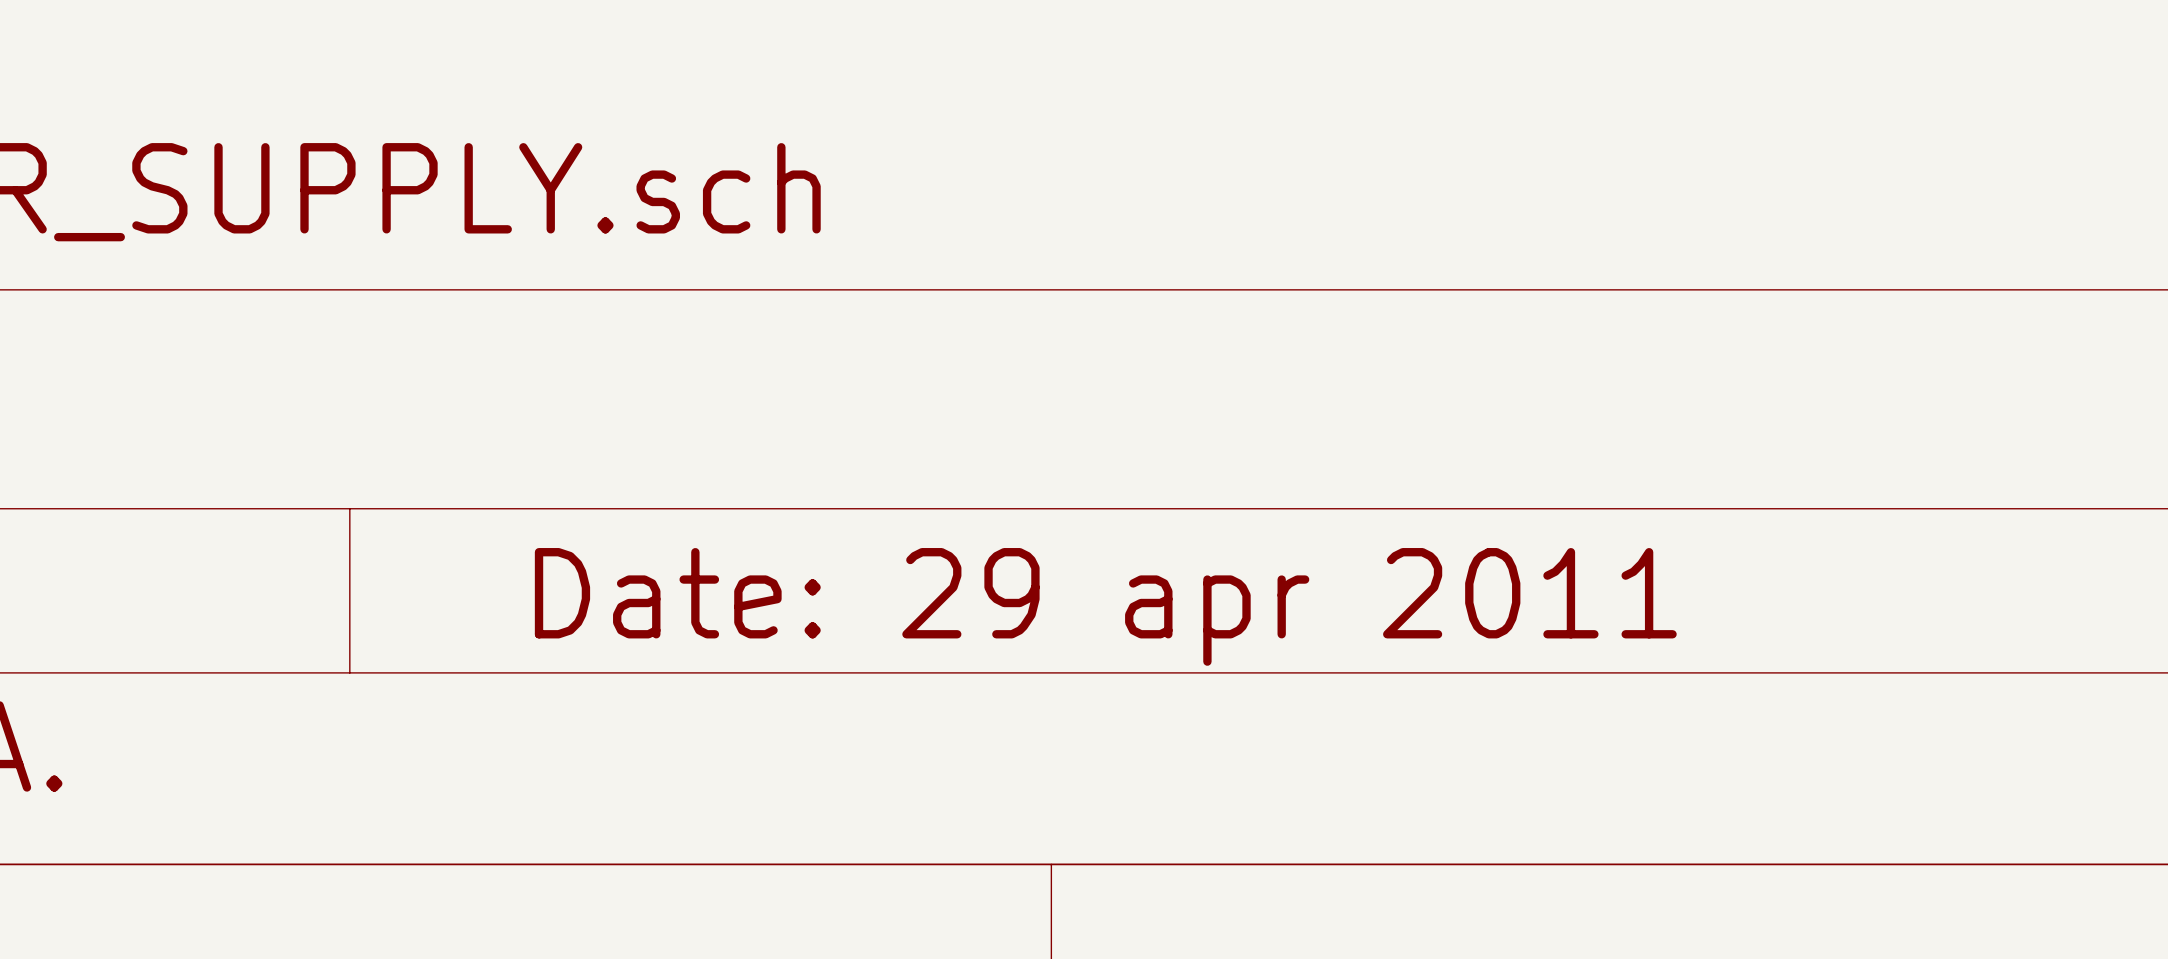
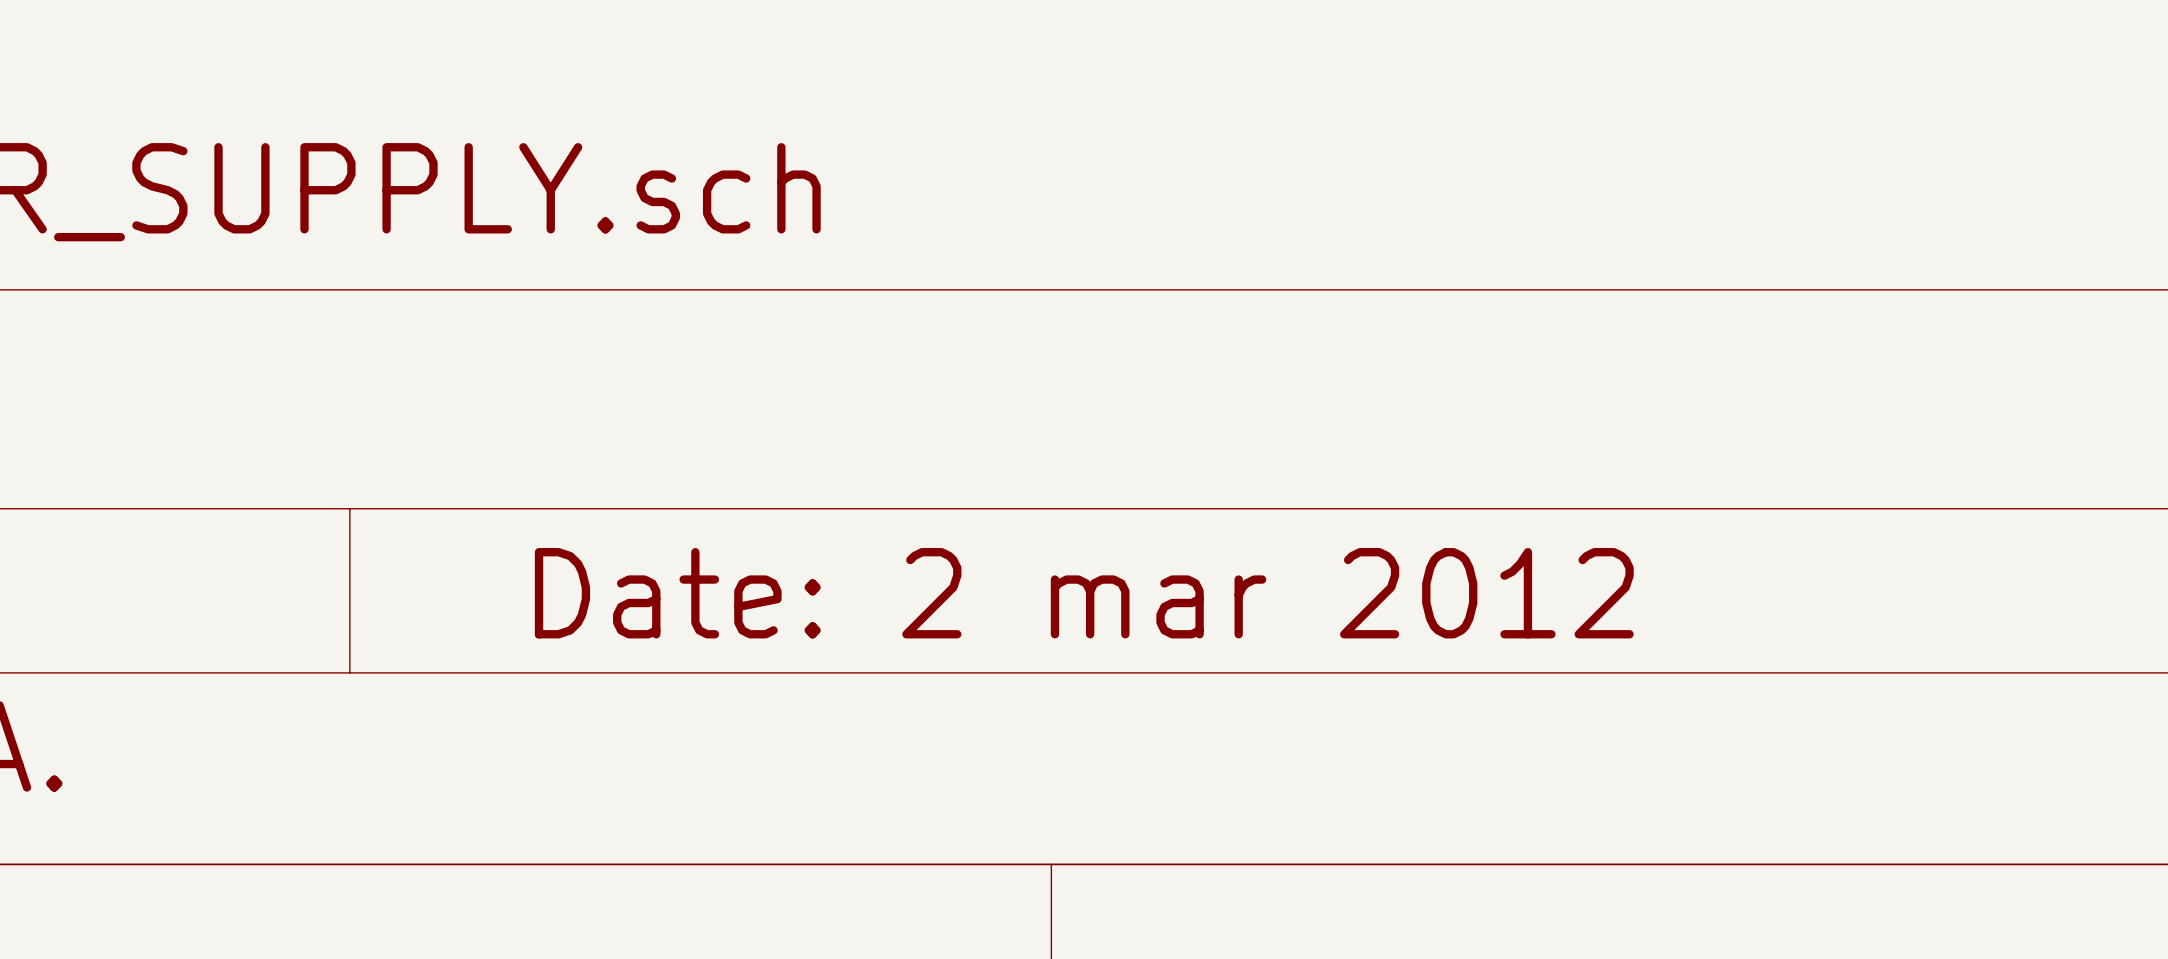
title block: Date: 29 apr 2011 (1105, 606) -> Date: 2 mar 2012 (1084, 593)

